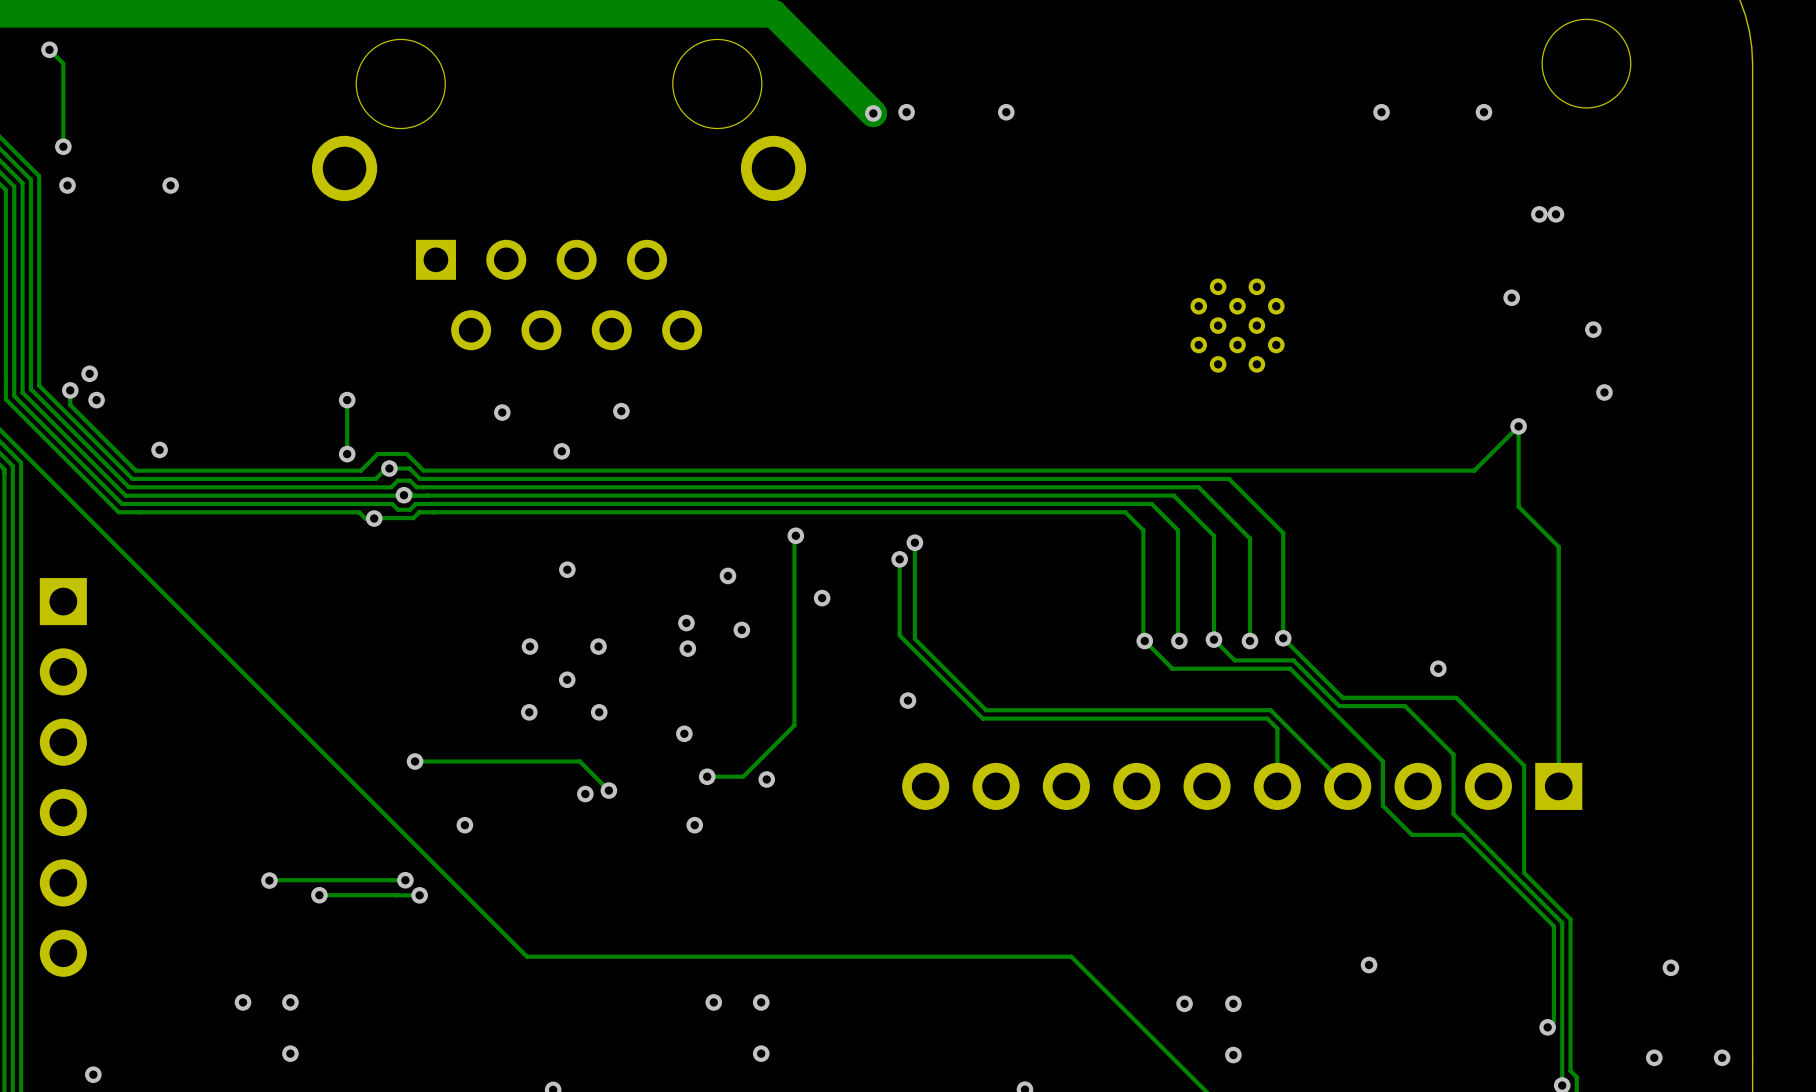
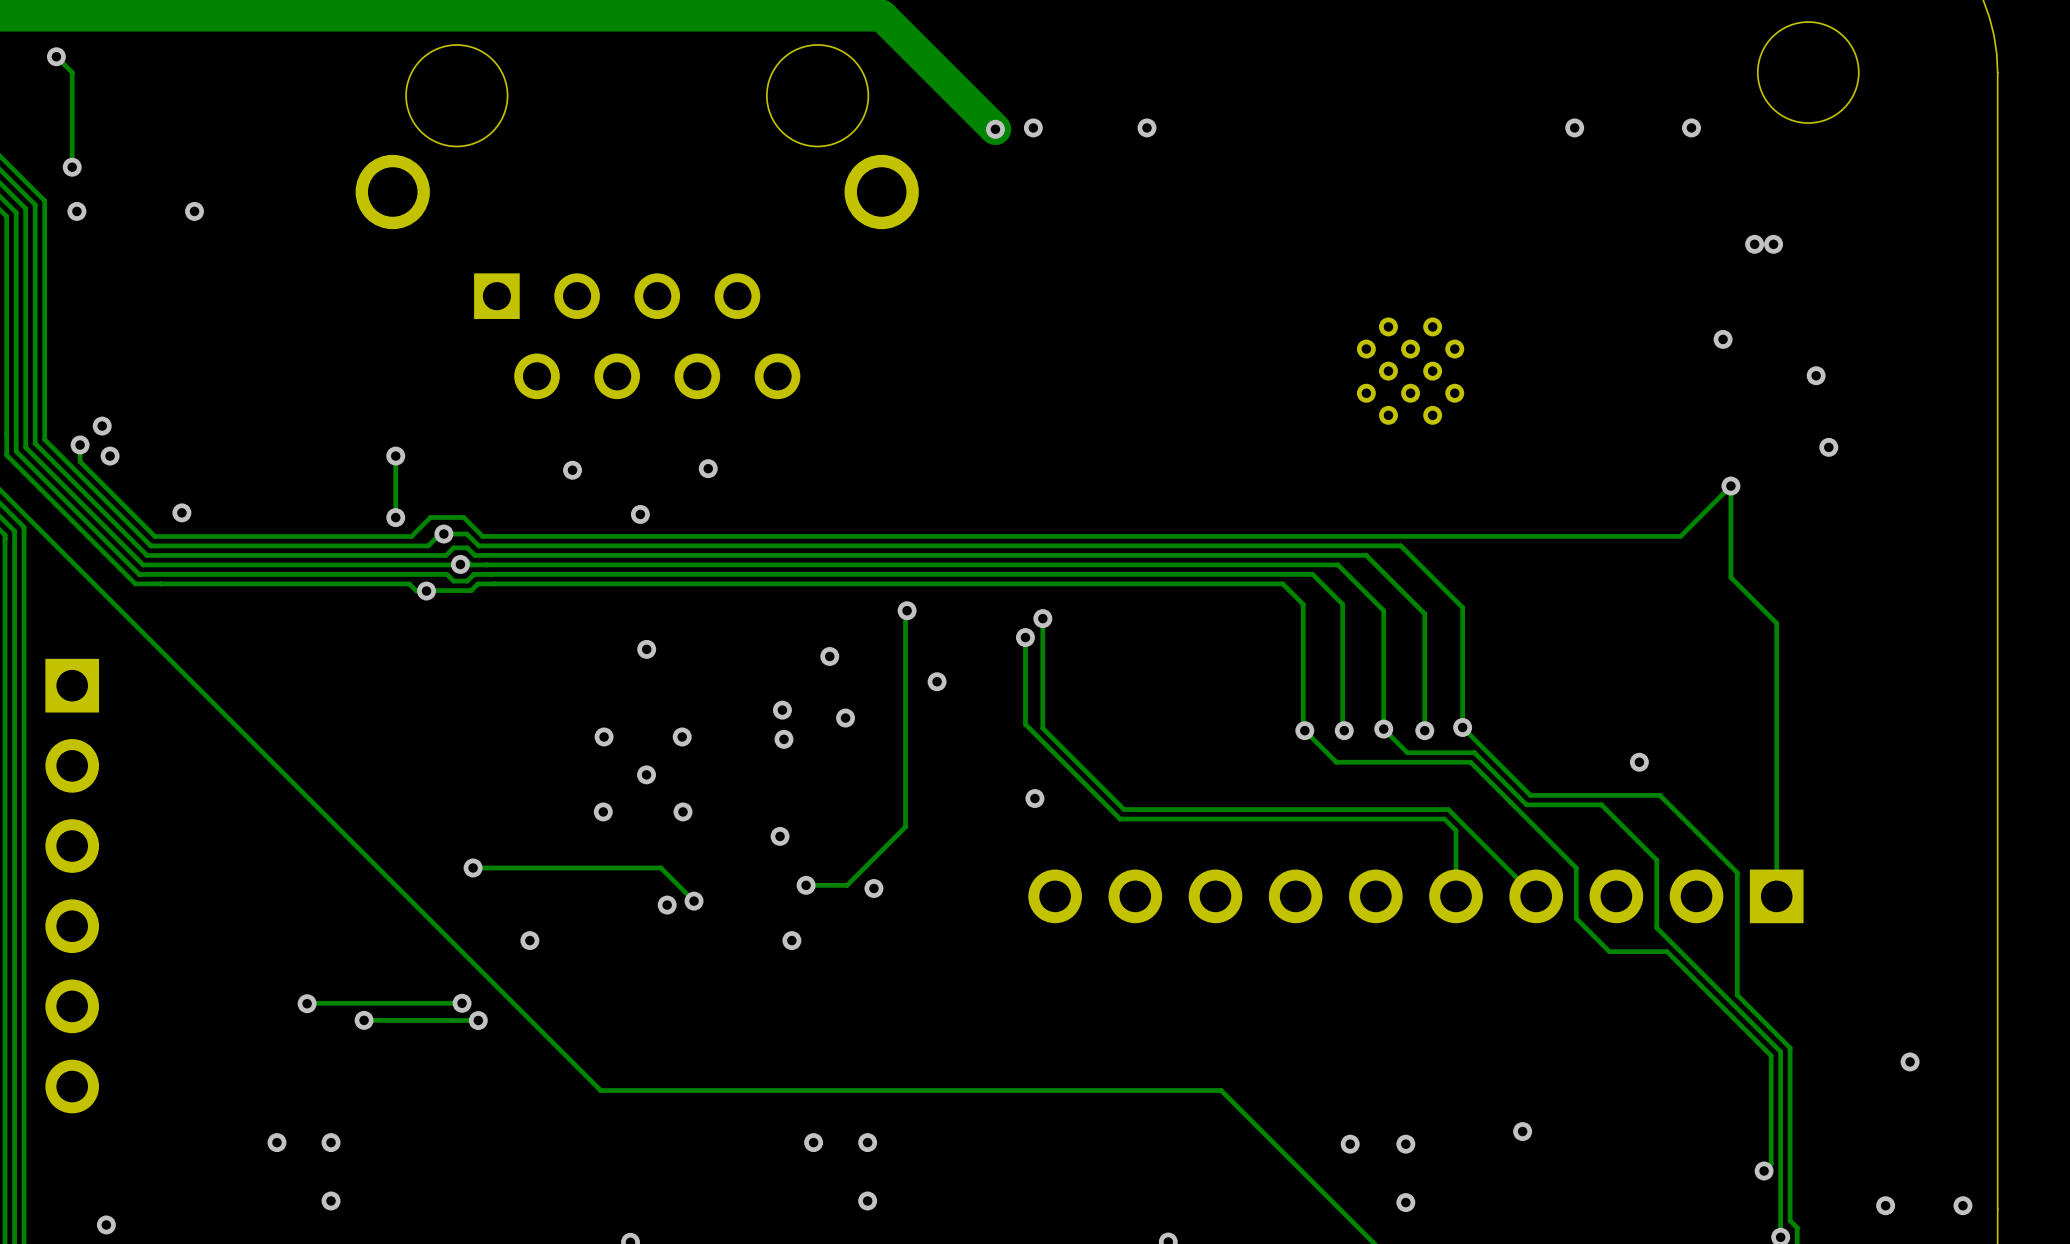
via position: (1369, 965) -> (1522, 1131)
via position: (1670, 967) -> (1910, 1061)

